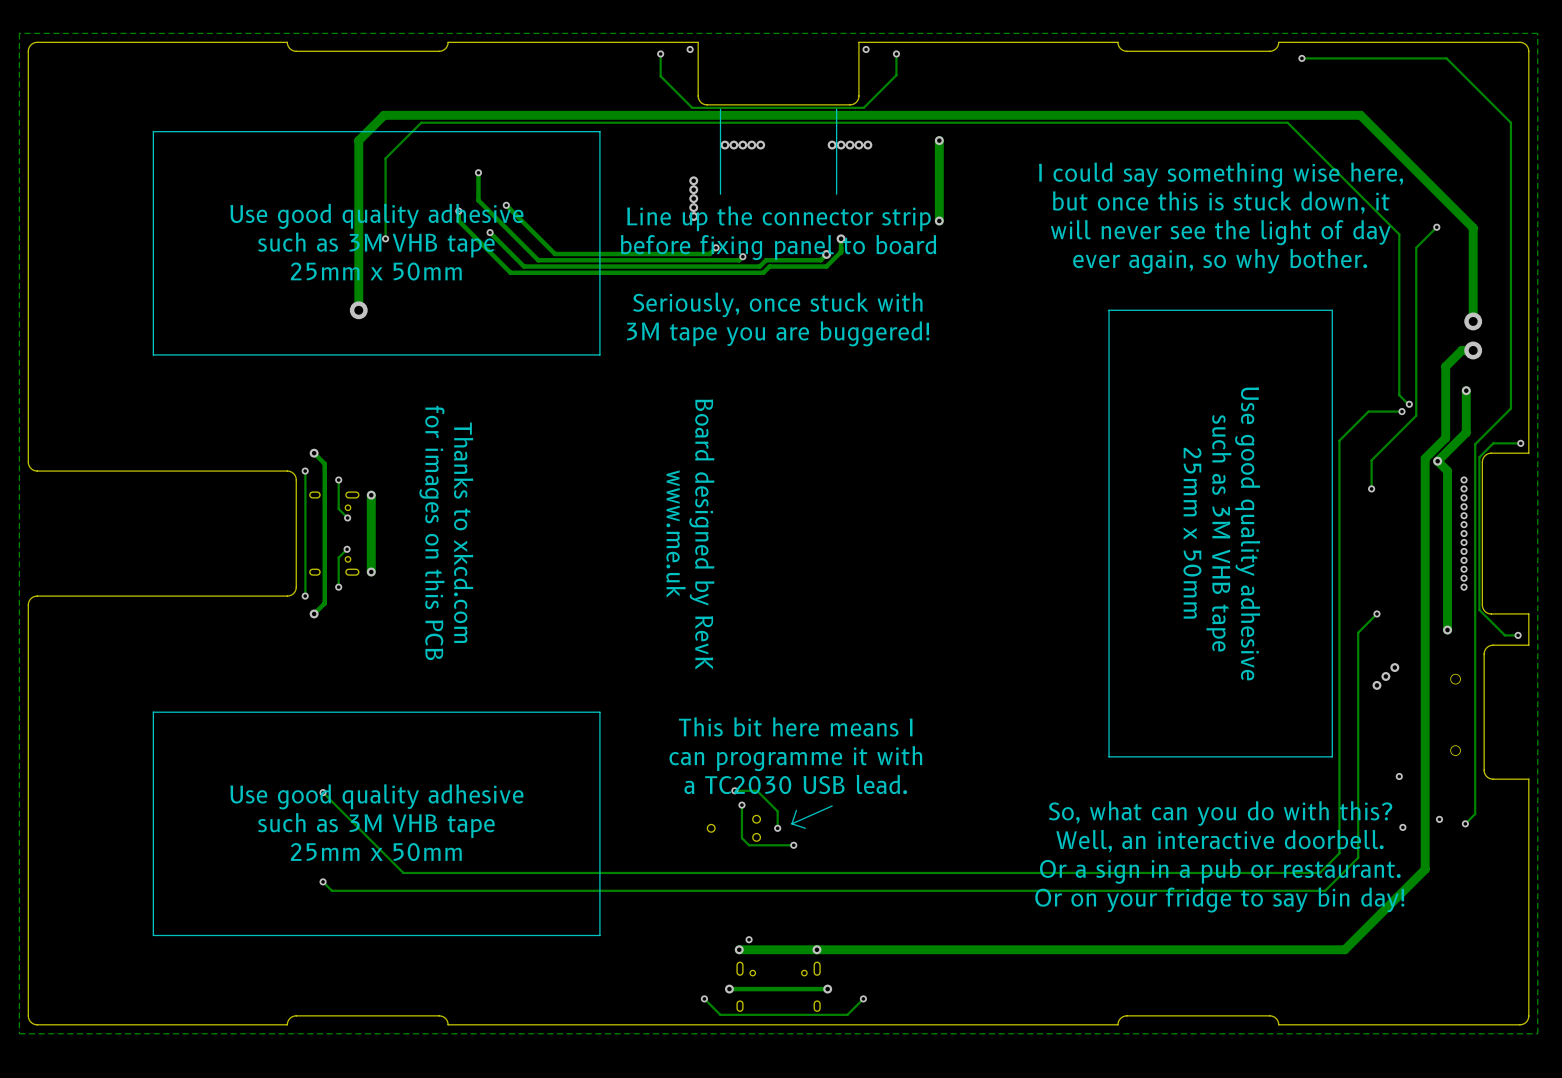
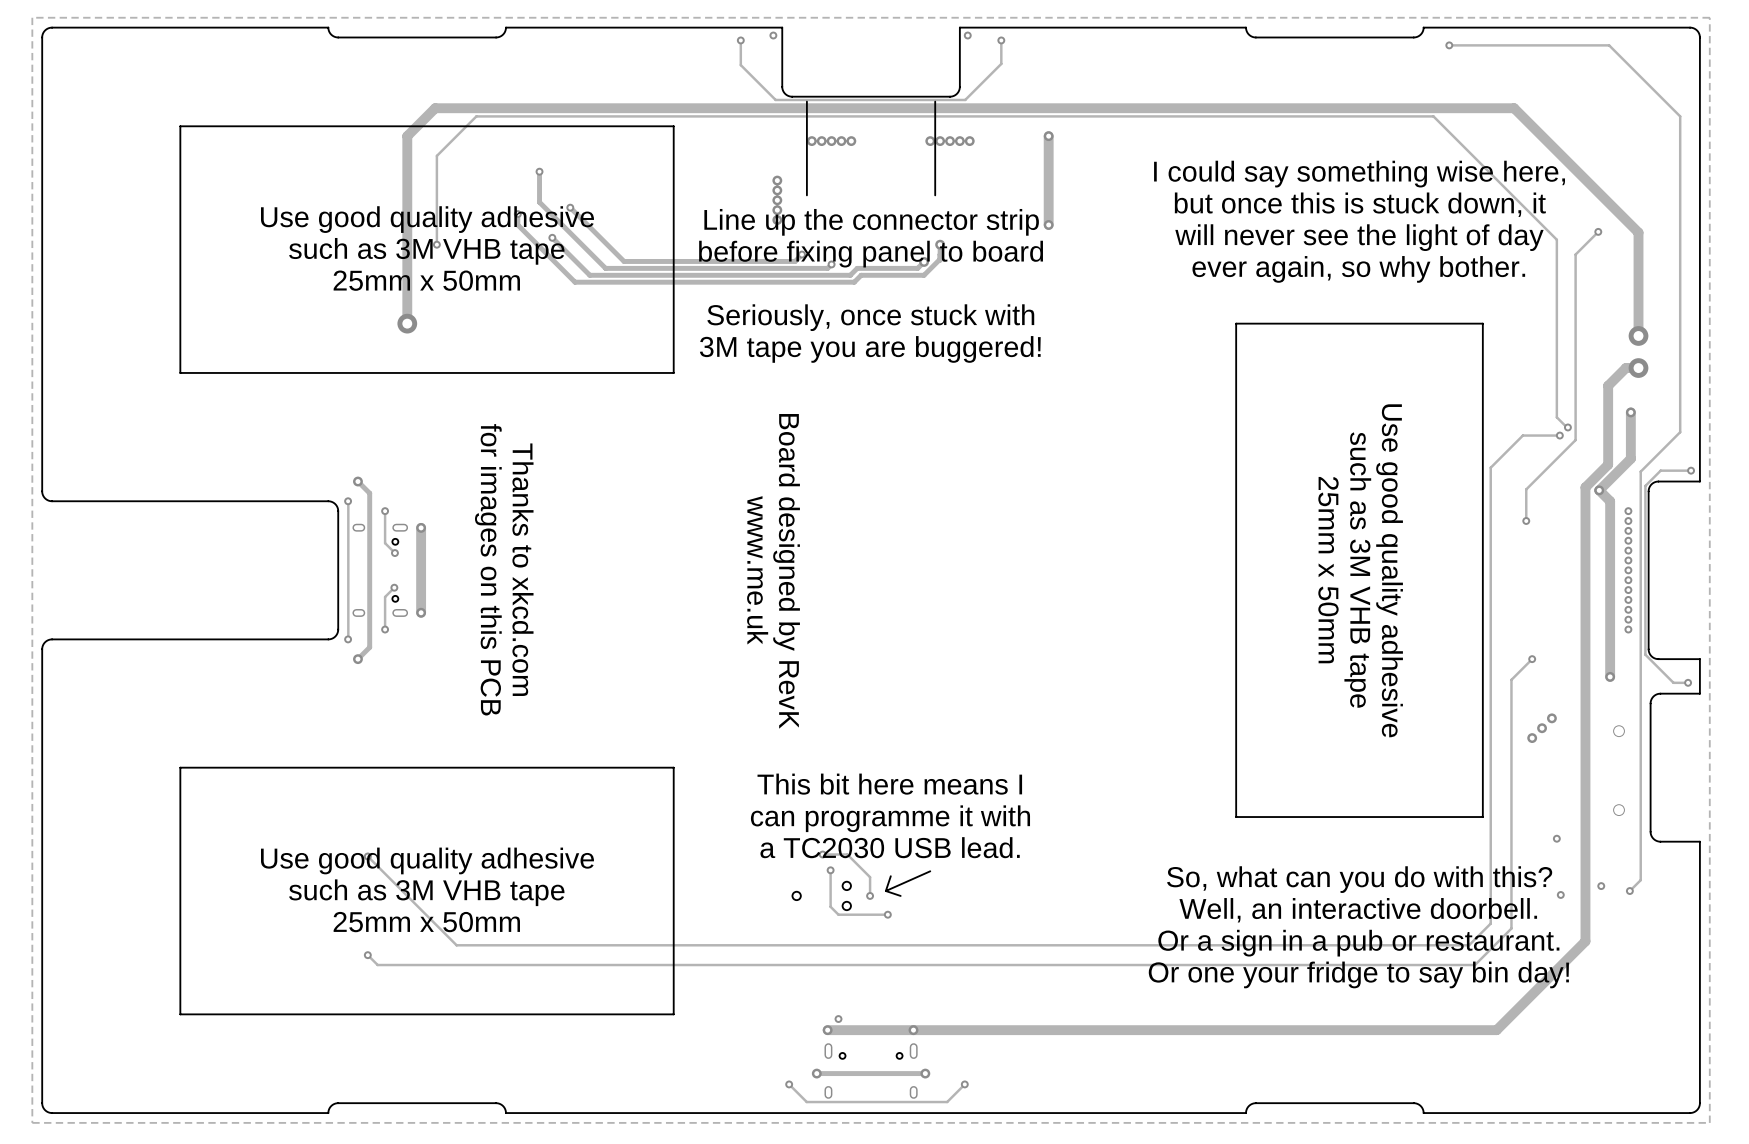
text: Or on your fridge to say bin day! (1219, 900) -> Or one your fridge to say bin day! (1358, 974)

